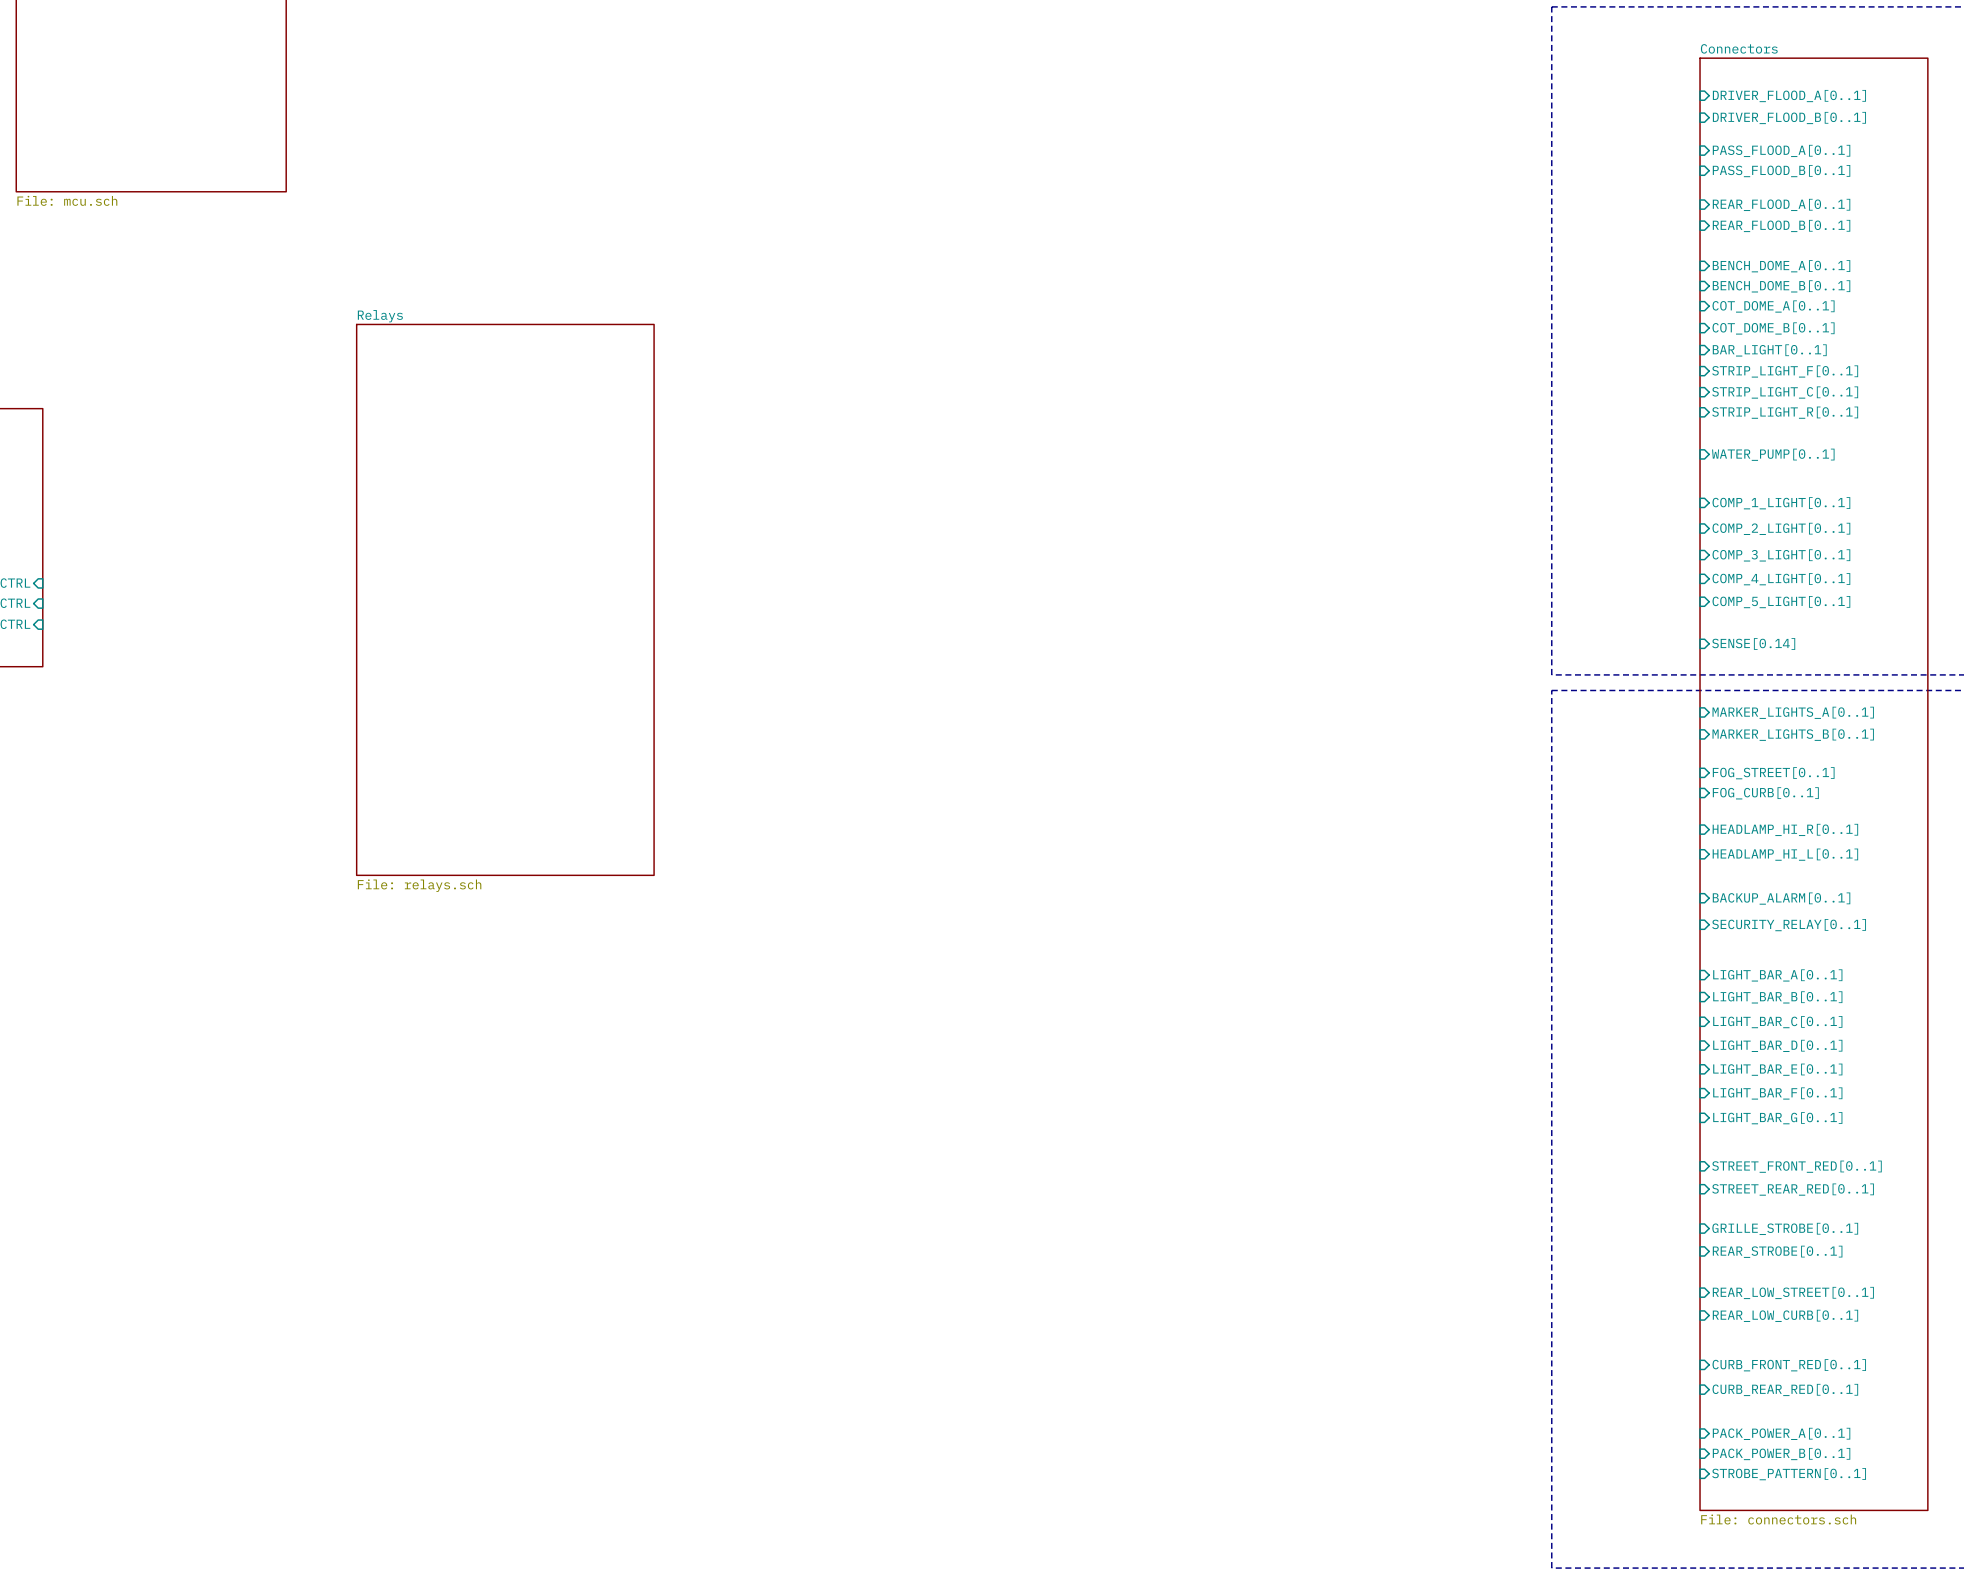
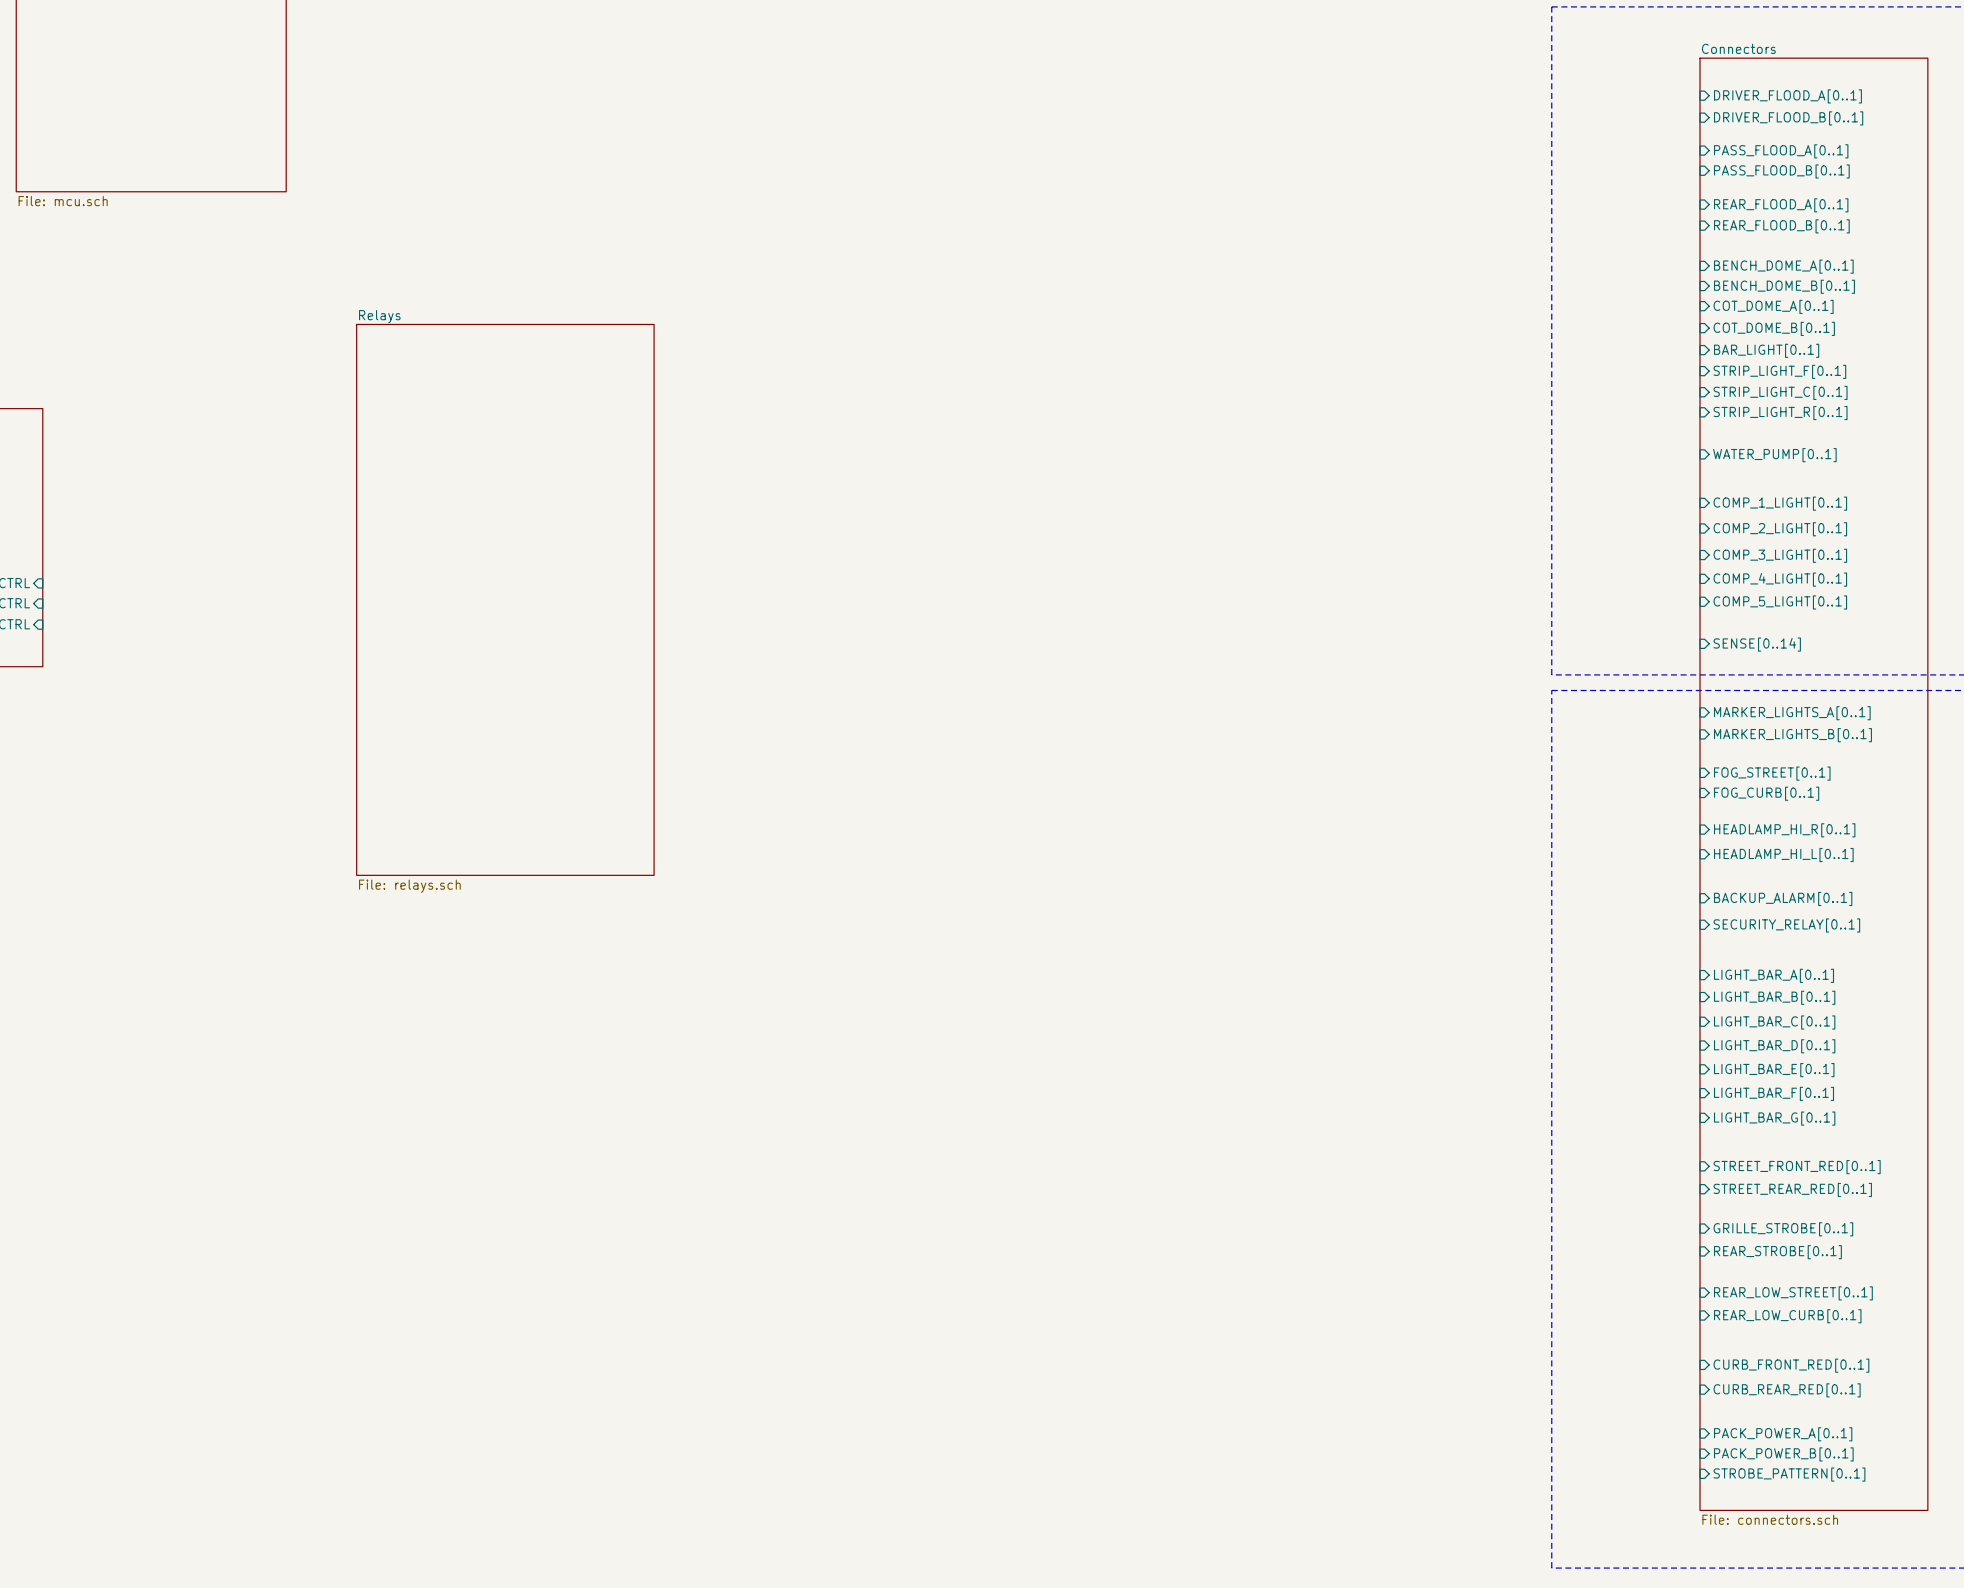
sheet pin: SENSE[0.14] (1753, 643) -> SENSE[0..14] (1757, 644)

